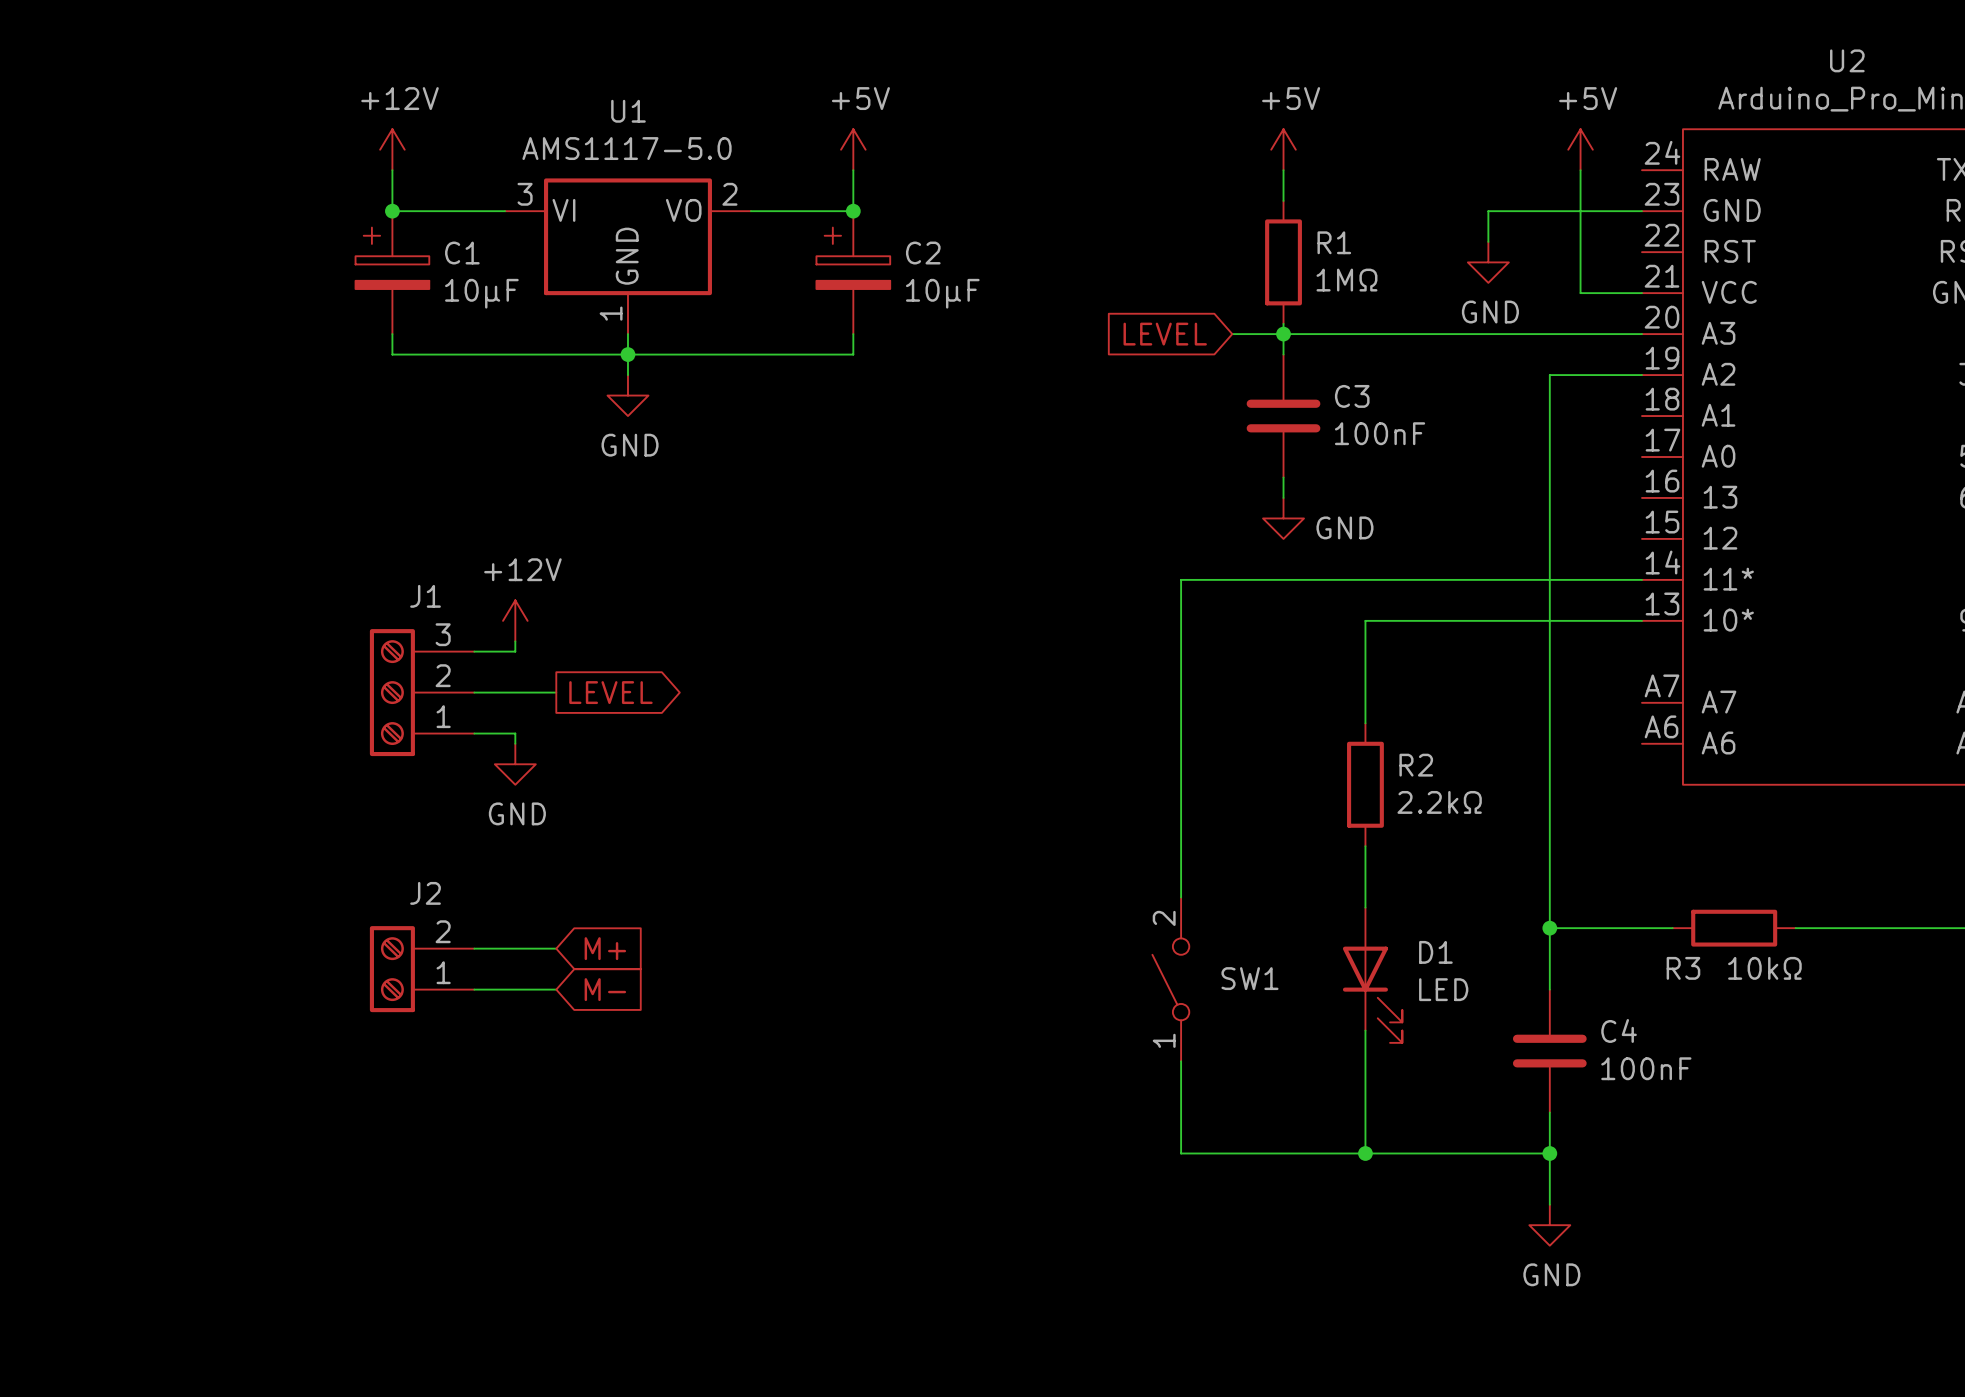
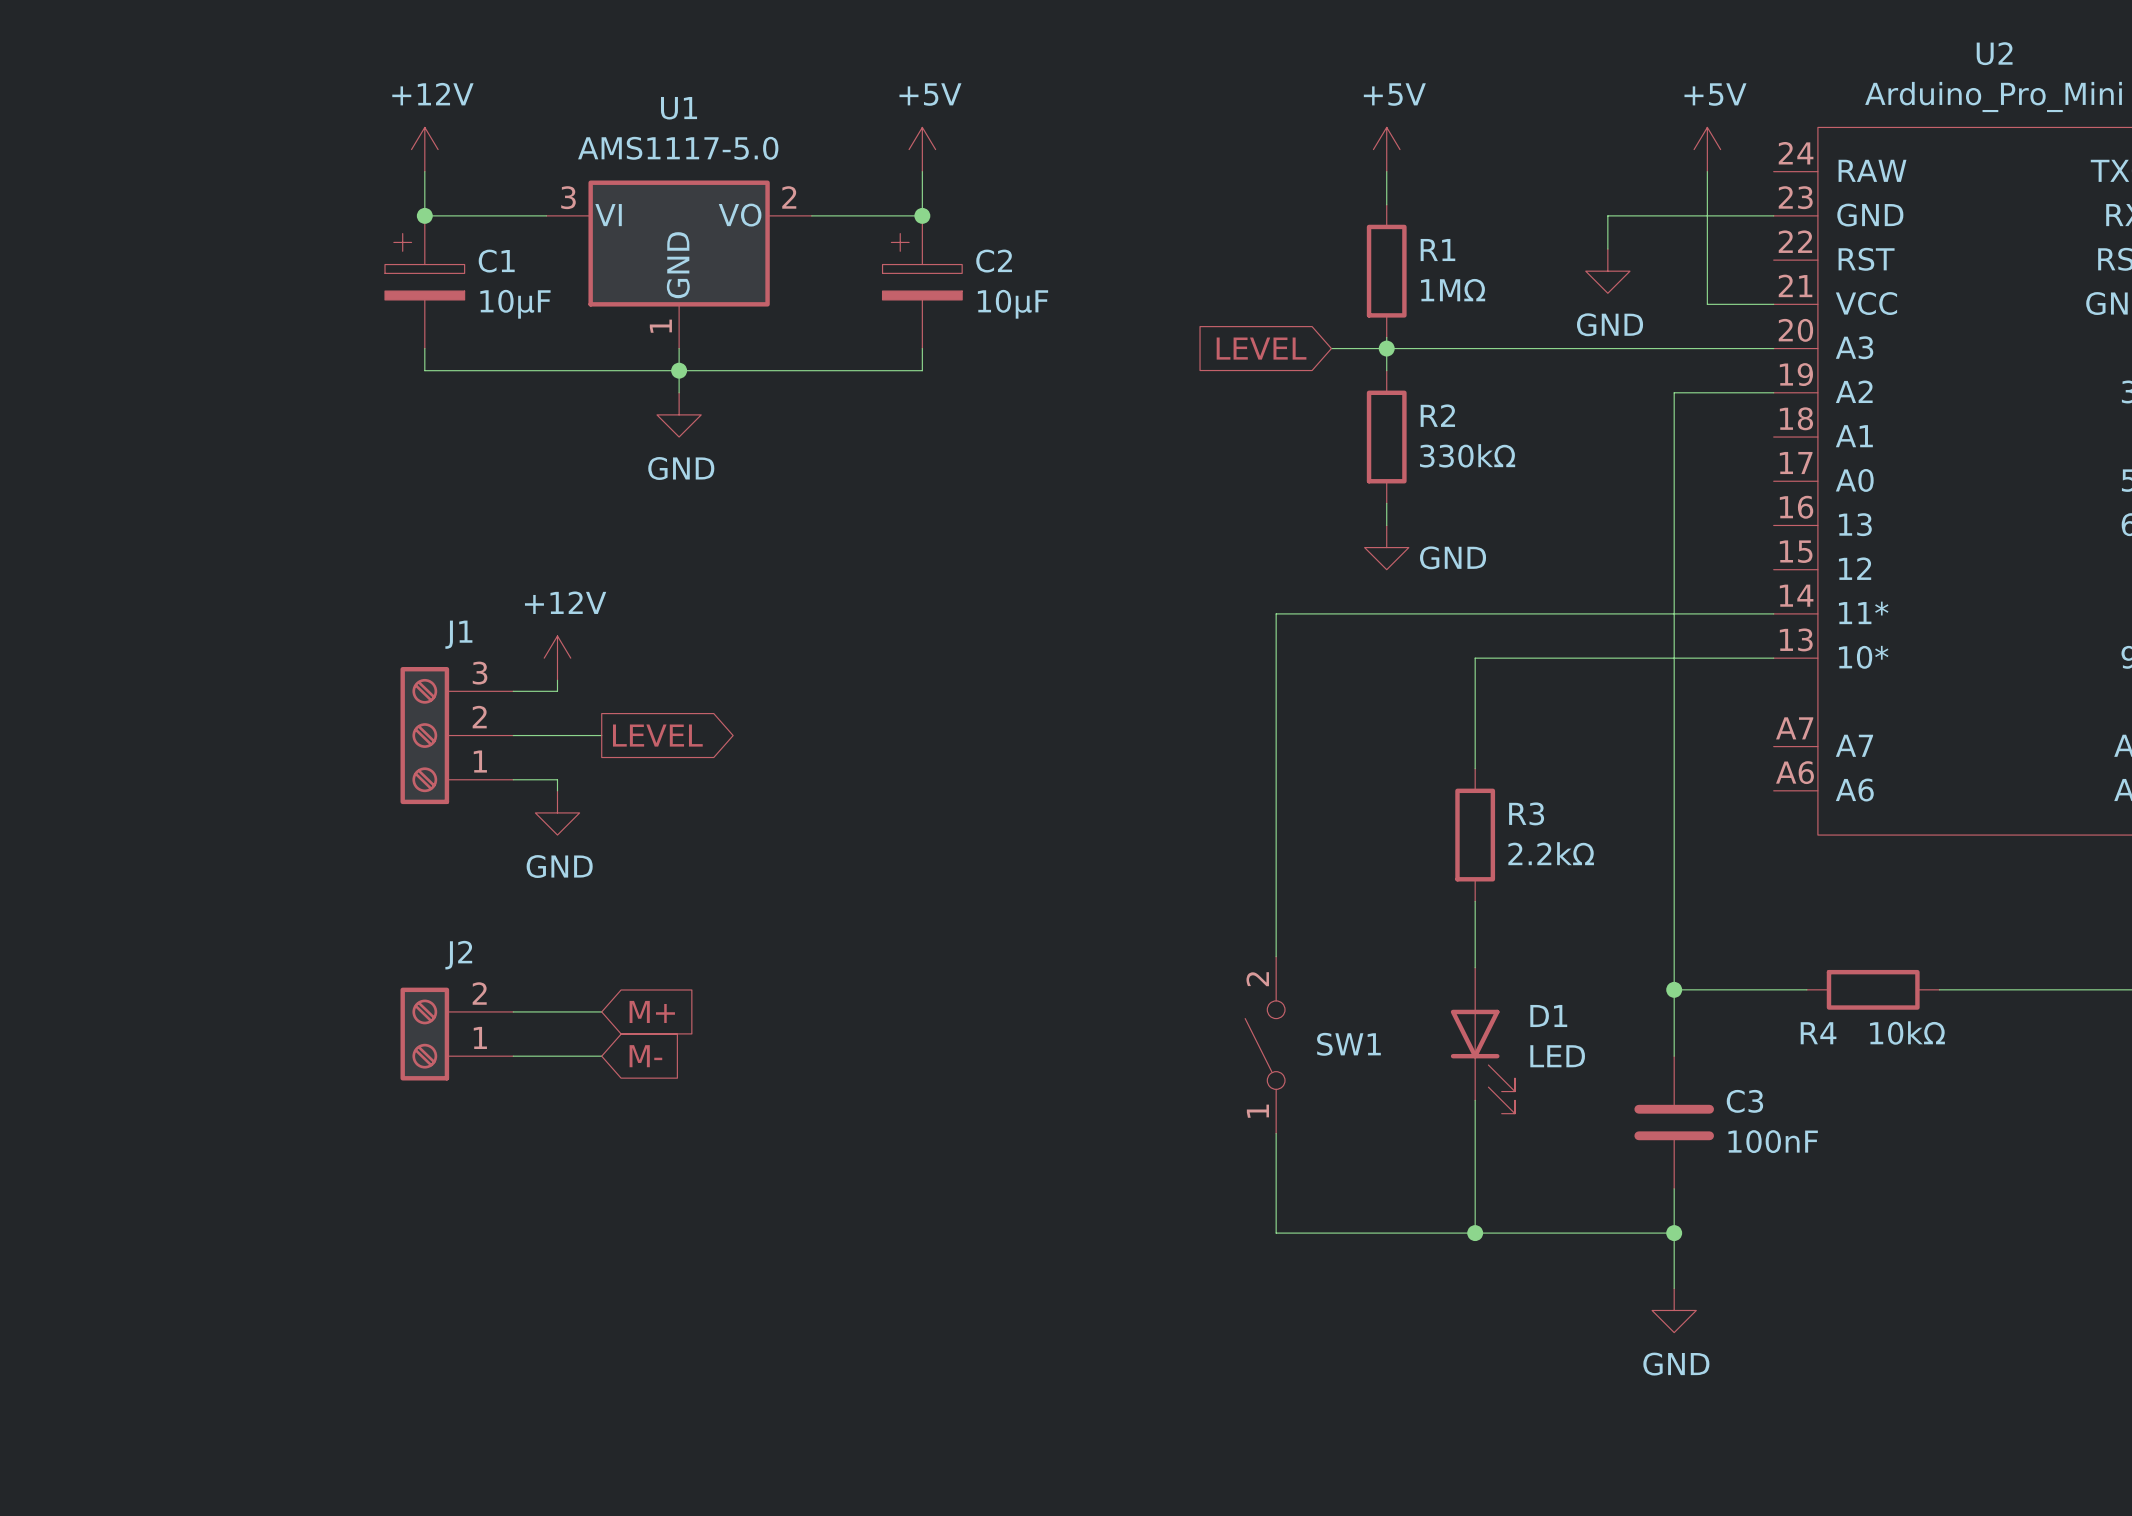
C3: 100nF (1283, 416) -> none
R2: none -> 330kΩ (1386, 437)
R2 name: R2 (1416, 765) -> R3 (1526, 813)
R3 name: R3 (1683, 968) -> R4 (1818, 1033)
C4 name: C4 (1619, 1030) -> C3 (1744, 1101)

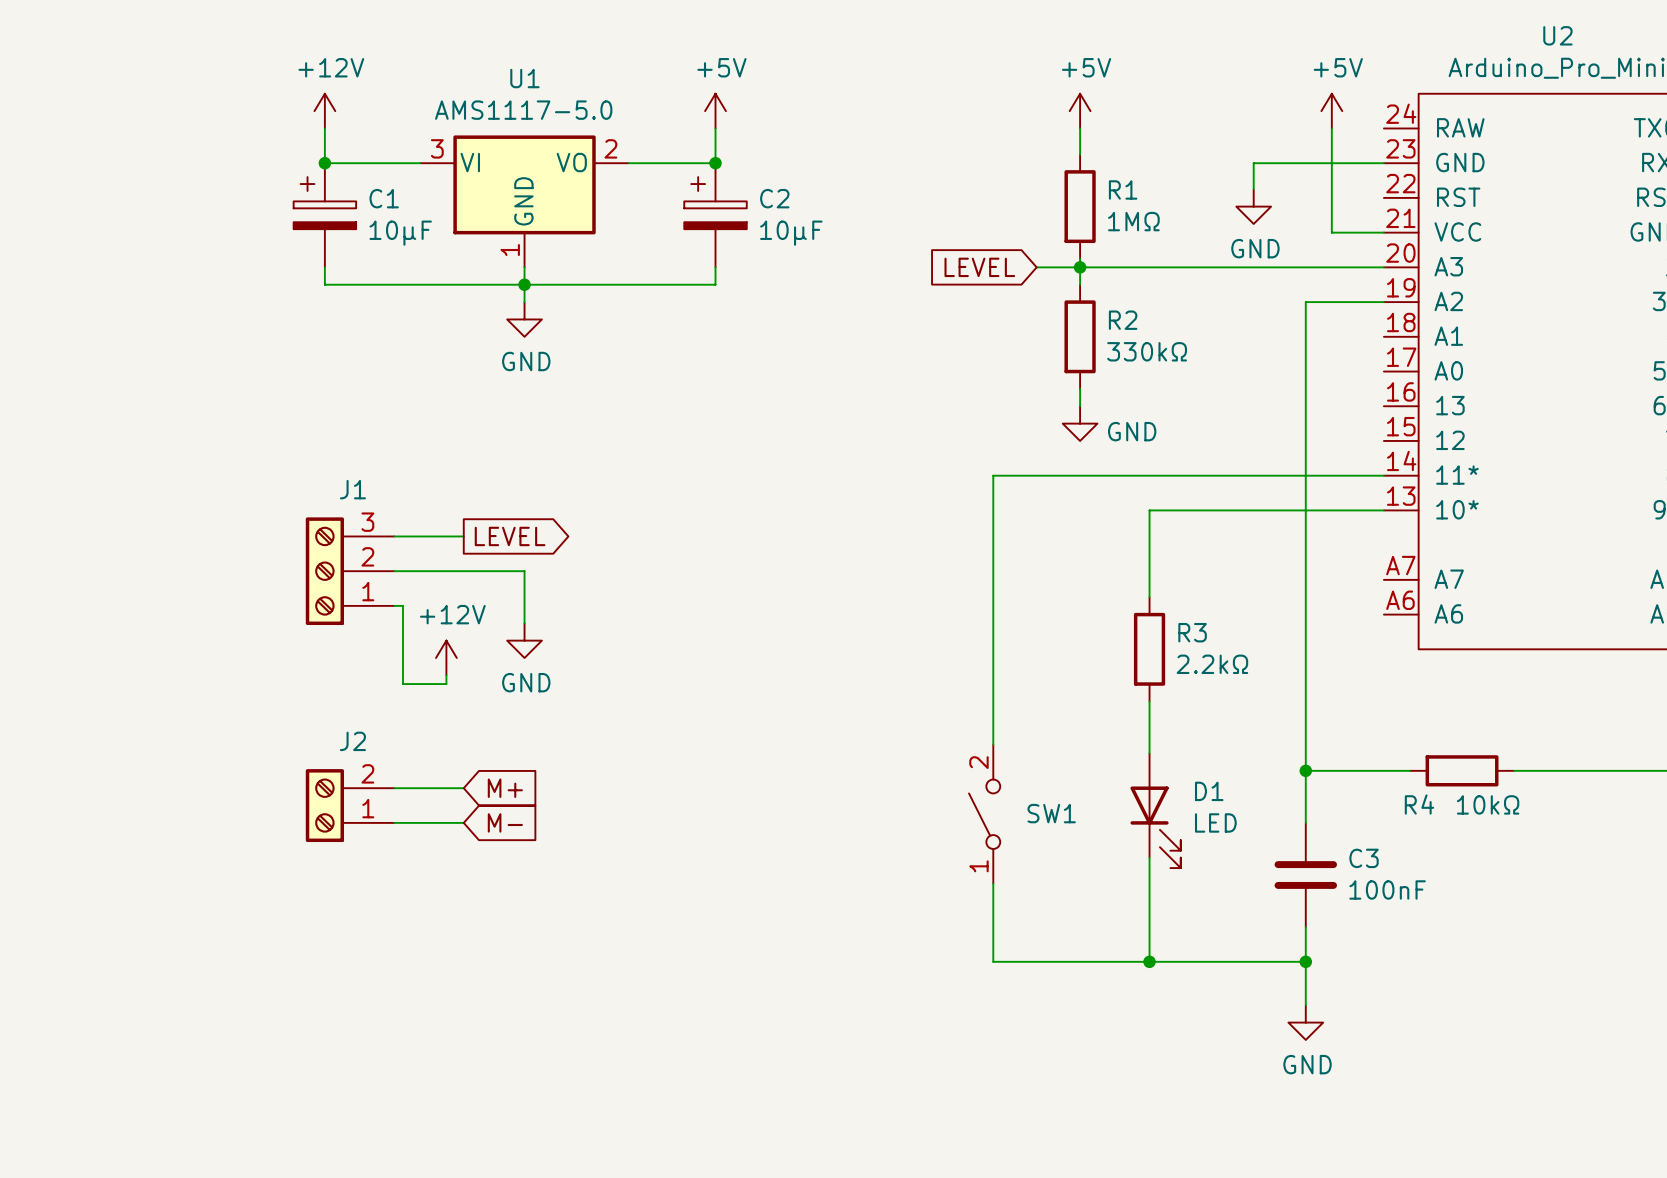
power symbol position: +12V (557, 658) -> +12V (446, 657)
wire: (557, 680) (557, 691) -> (463, 536) (429, 536)
wire: none -> (463, 571) (524, 571) (524, 623)
global label position: LEVEL (657, 735) -> LEVEL (510, 536)
wire: (524, 779) (557, 779) (557, 790) -> (403, 605) (403, 684) (446, 684) (446, 675)
power symbol position: GND (557, 812) -> GND (524, 640)

